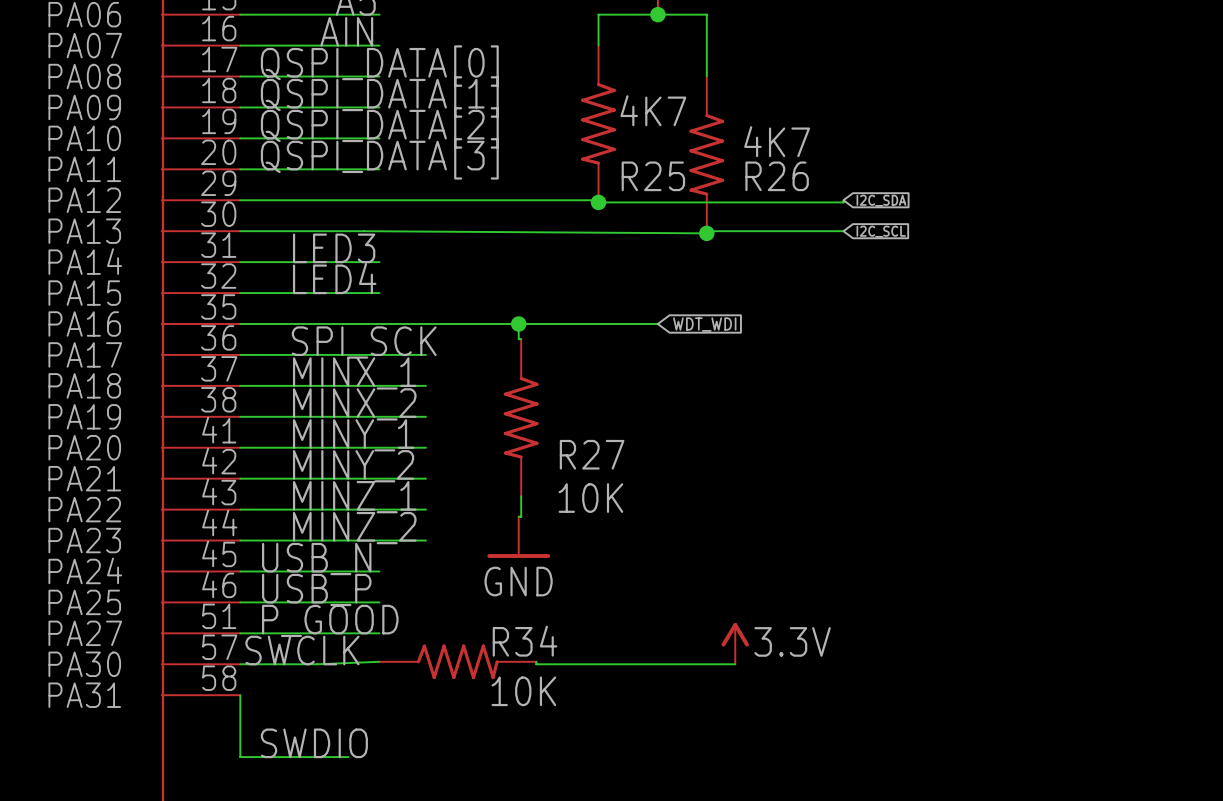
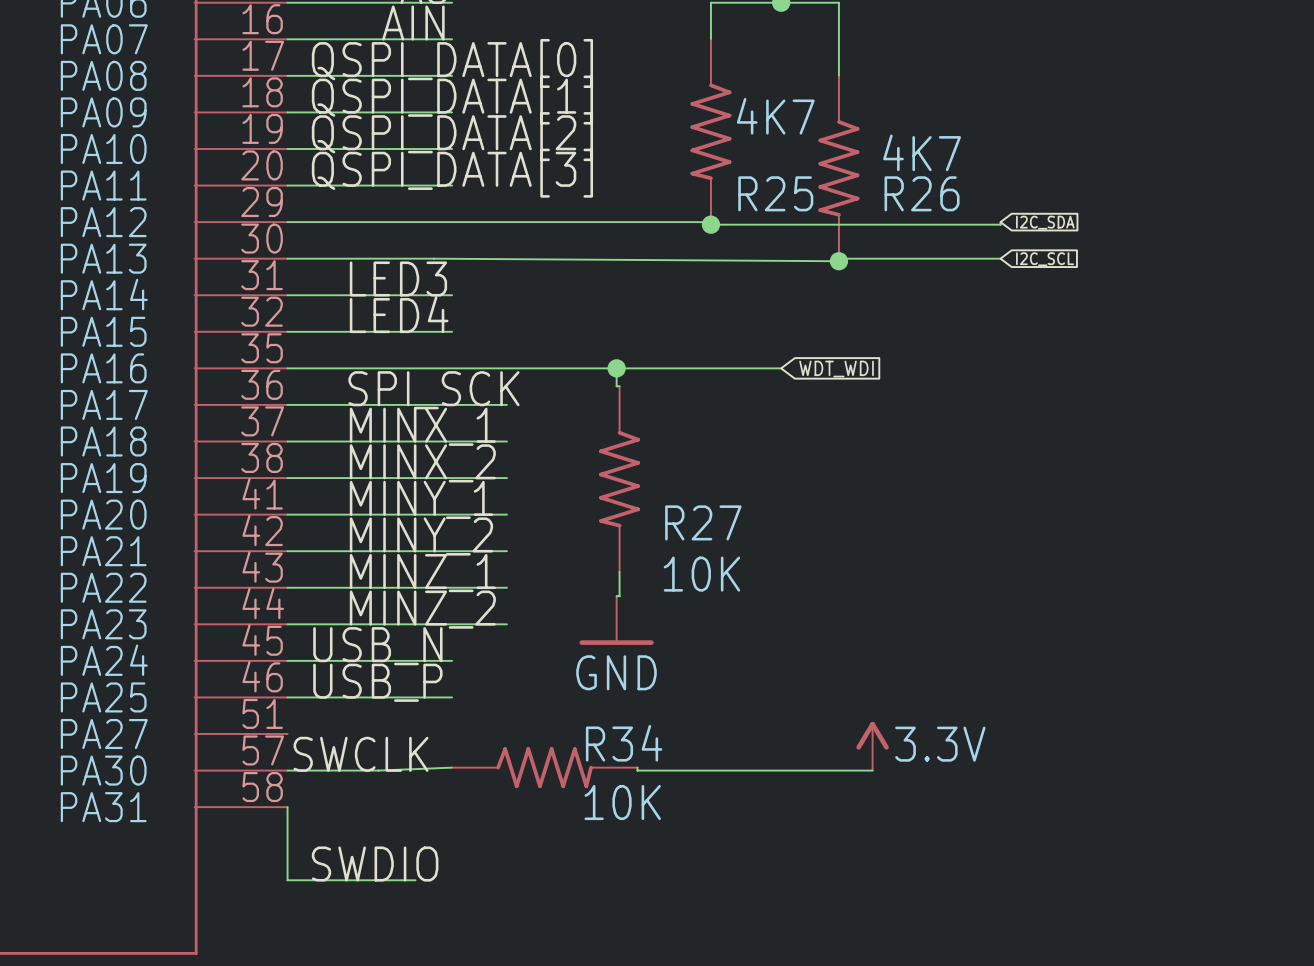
label: P_GOOD (330, 620) -> none
wire: (240, 633) (379, 633) -> none

